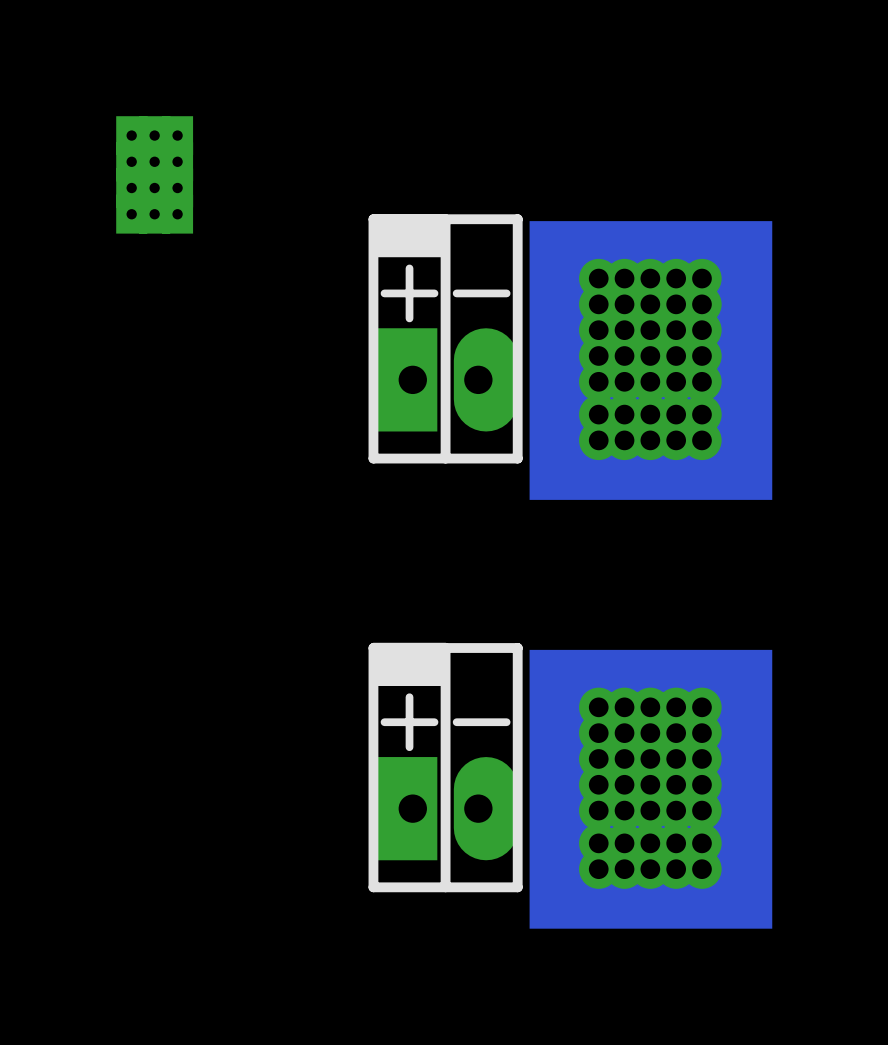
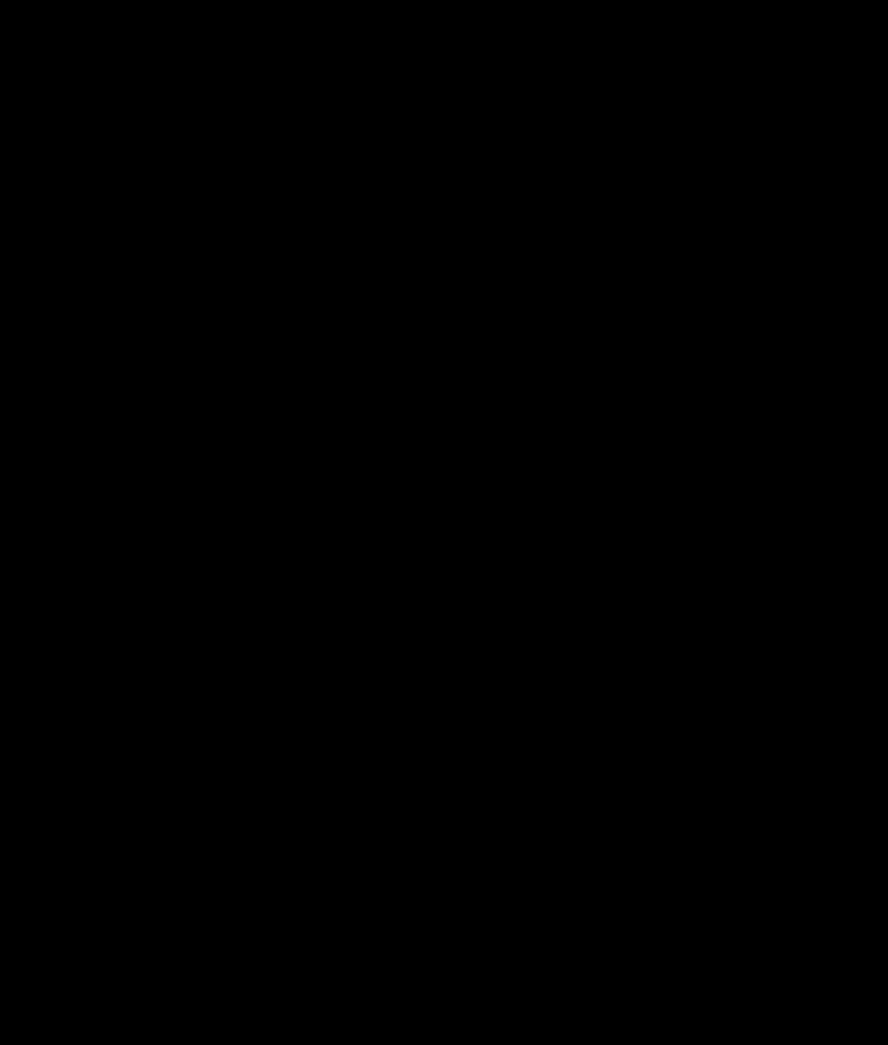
part: (154, 174) -> none
part: (445, 338) -> none
part: (650, 360) -> none
part: (445, 767) -> none
part: (650, 789) -> none

